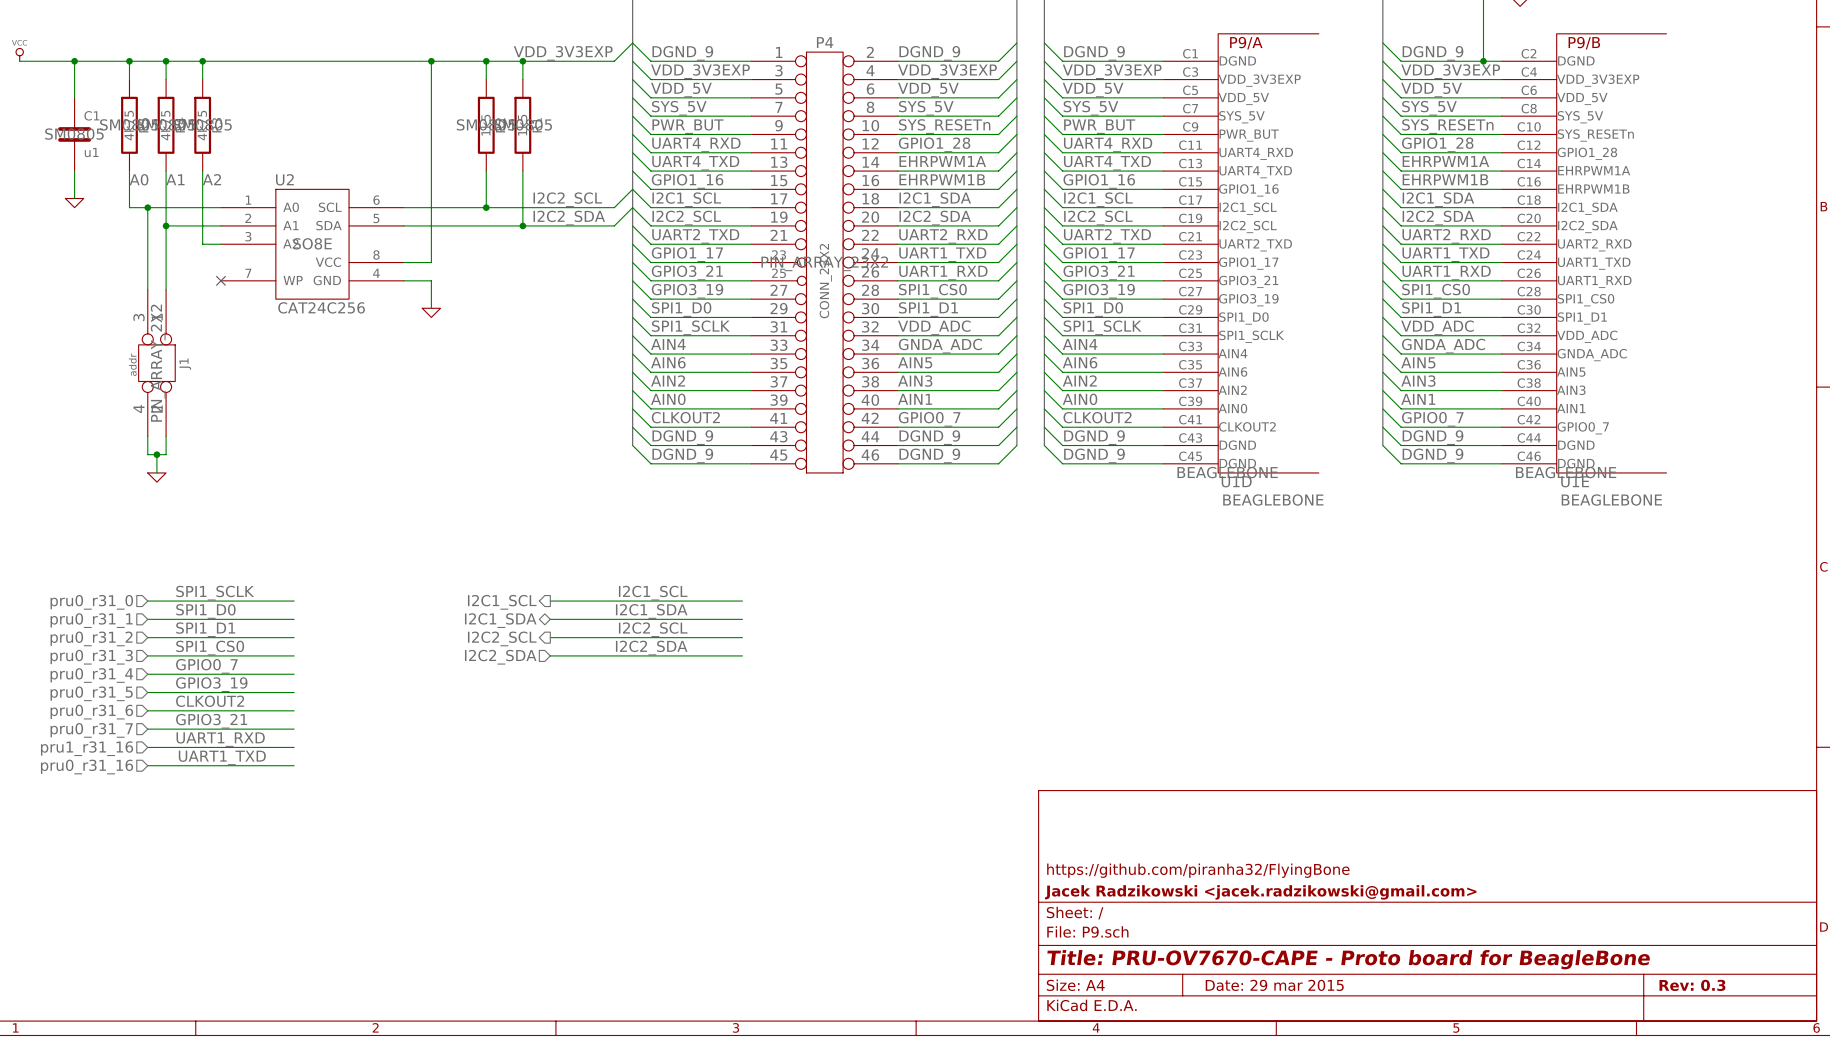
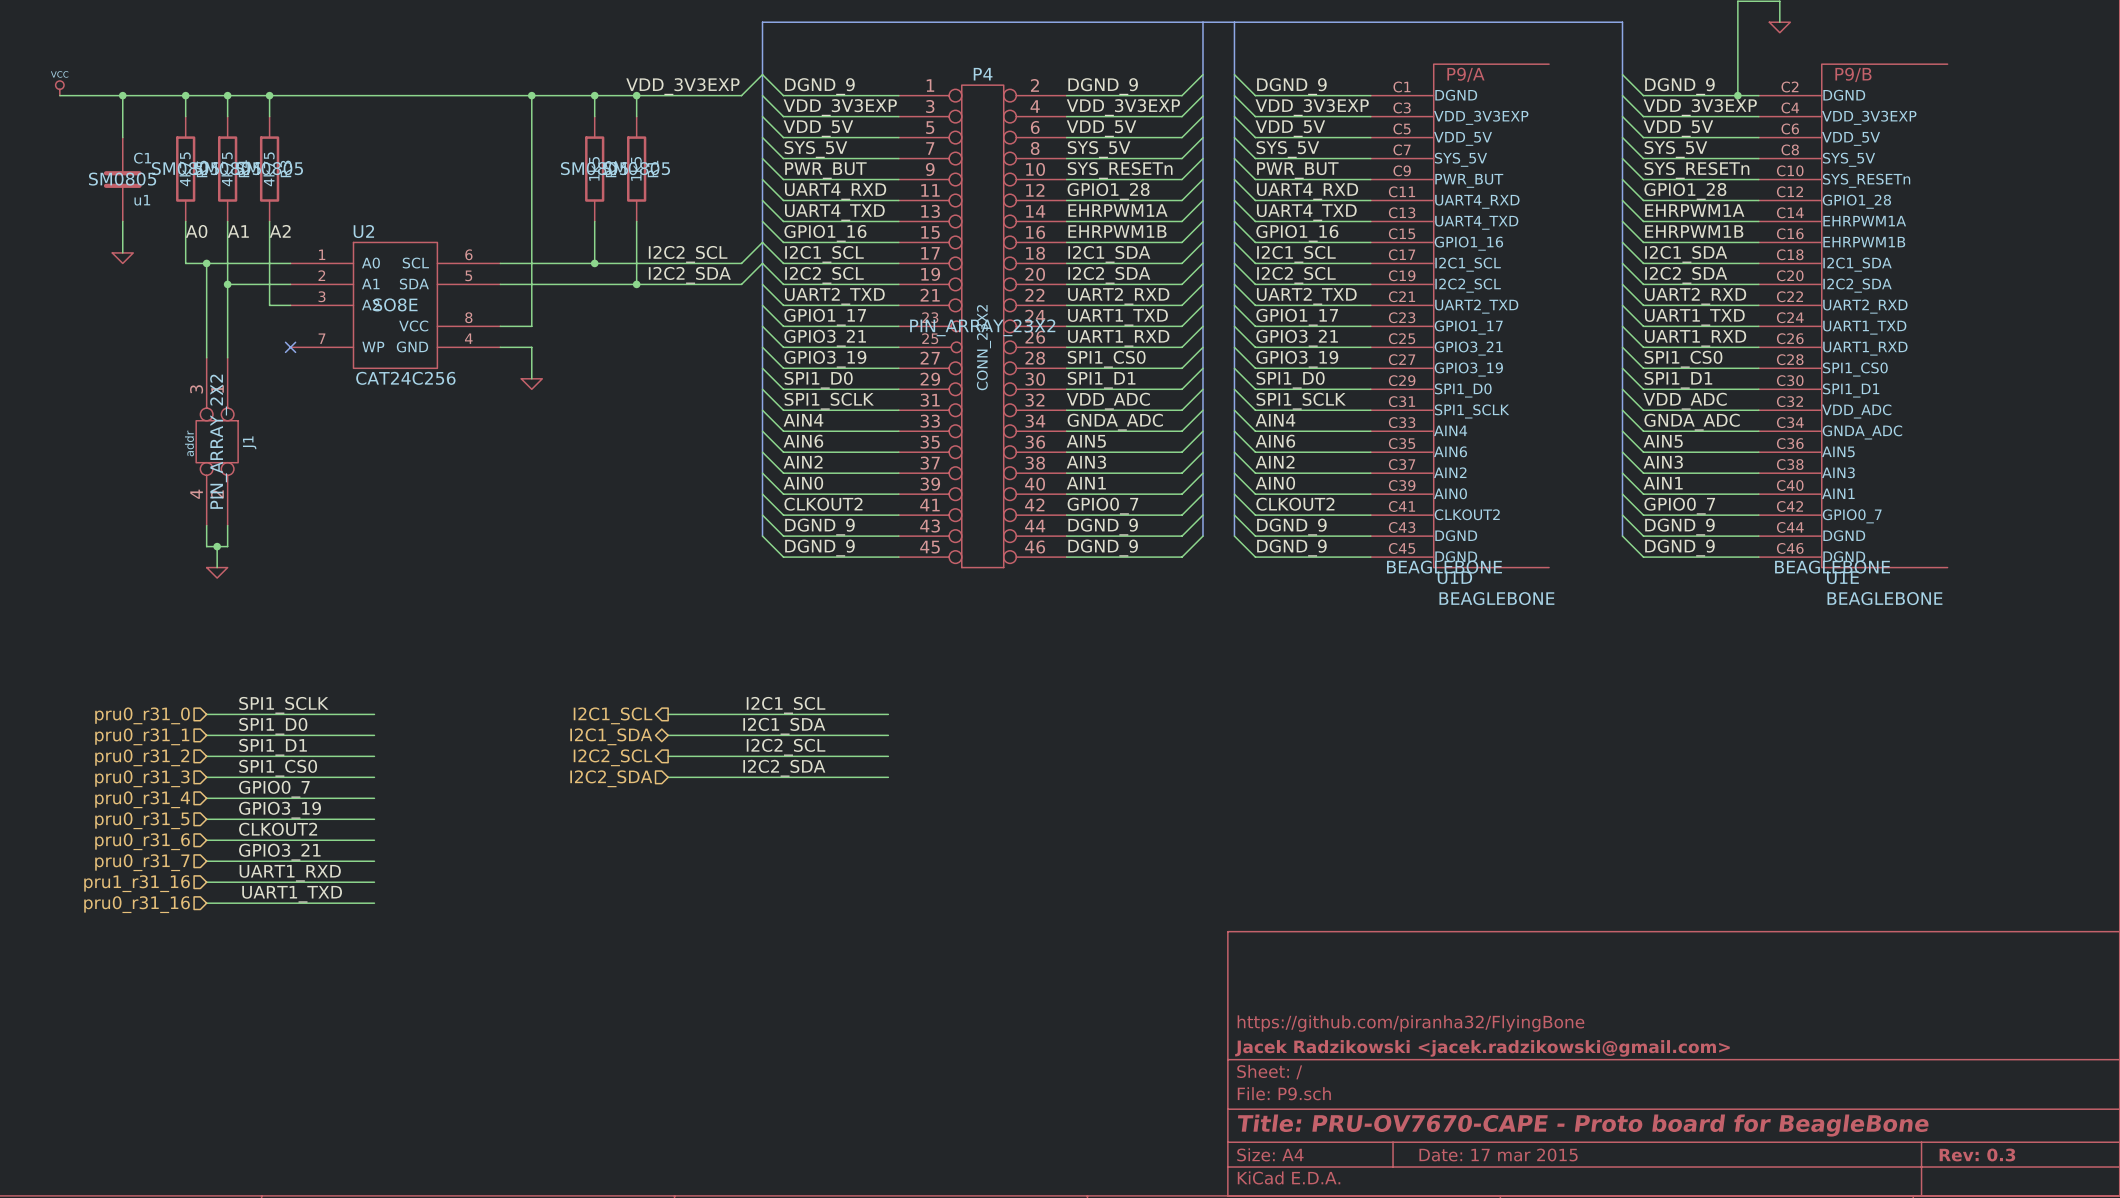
title block: Date: 29 mar 2015 (1274, 985) -> Date: 17 mar 2015 (1498, 1154)

